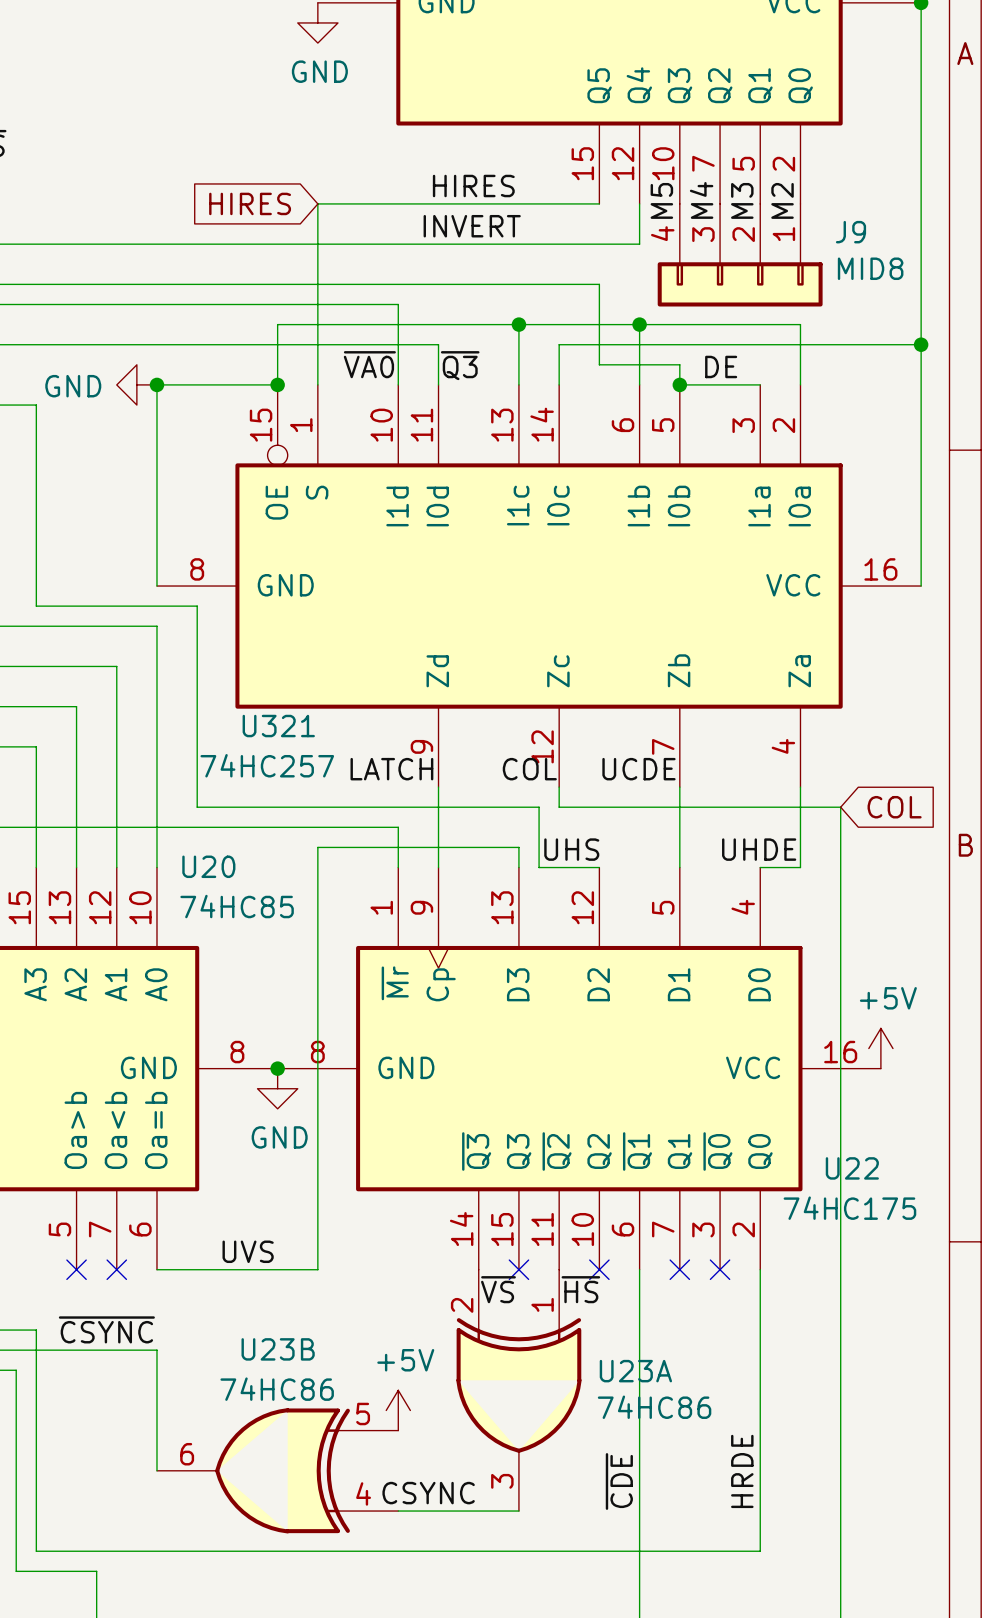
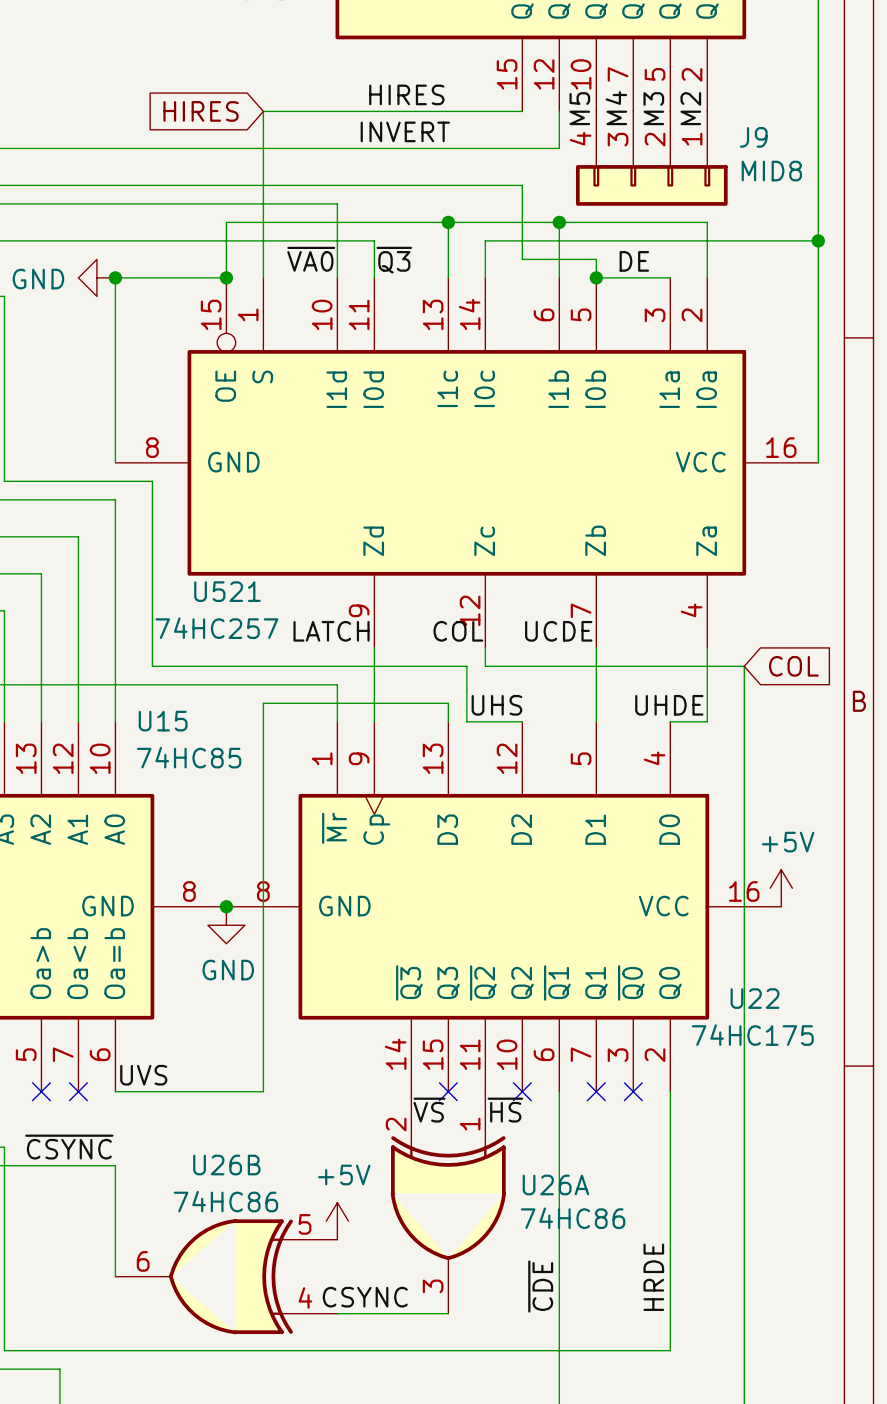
U321 name: U321 (278, 726) -> U521 (227, 591)
U20 name: U20 (208, 866) -> U15 (163, 721)
label position: UVS (248, 1251) -> UVS (143, 1075)
U23B name: U23B (278, 1349) -> U26B (226, 1165)
U23A name: U23A (635, 1371) -> U26A (555, 1184)

